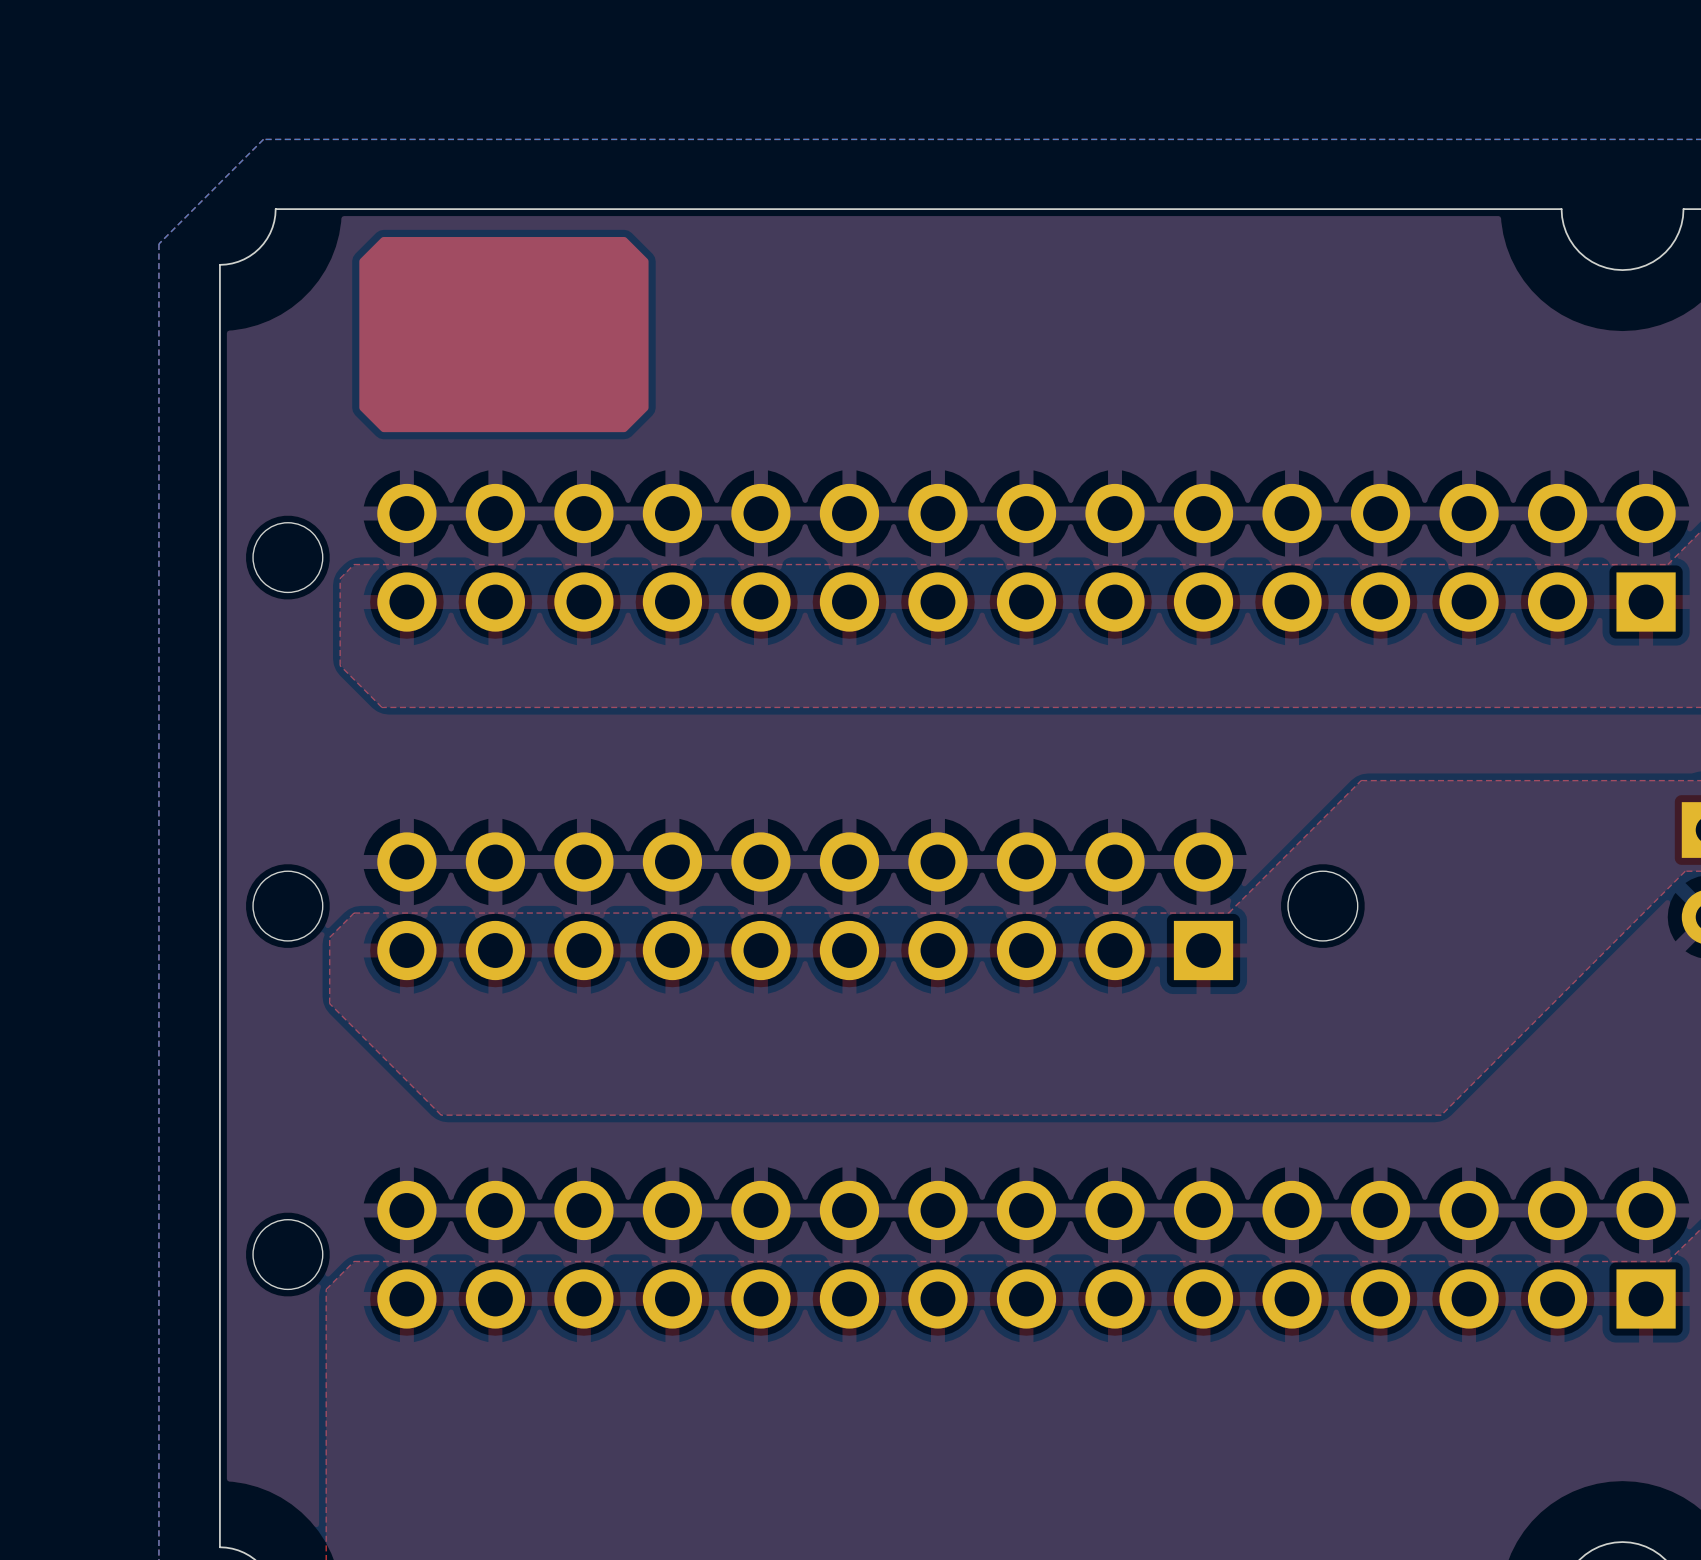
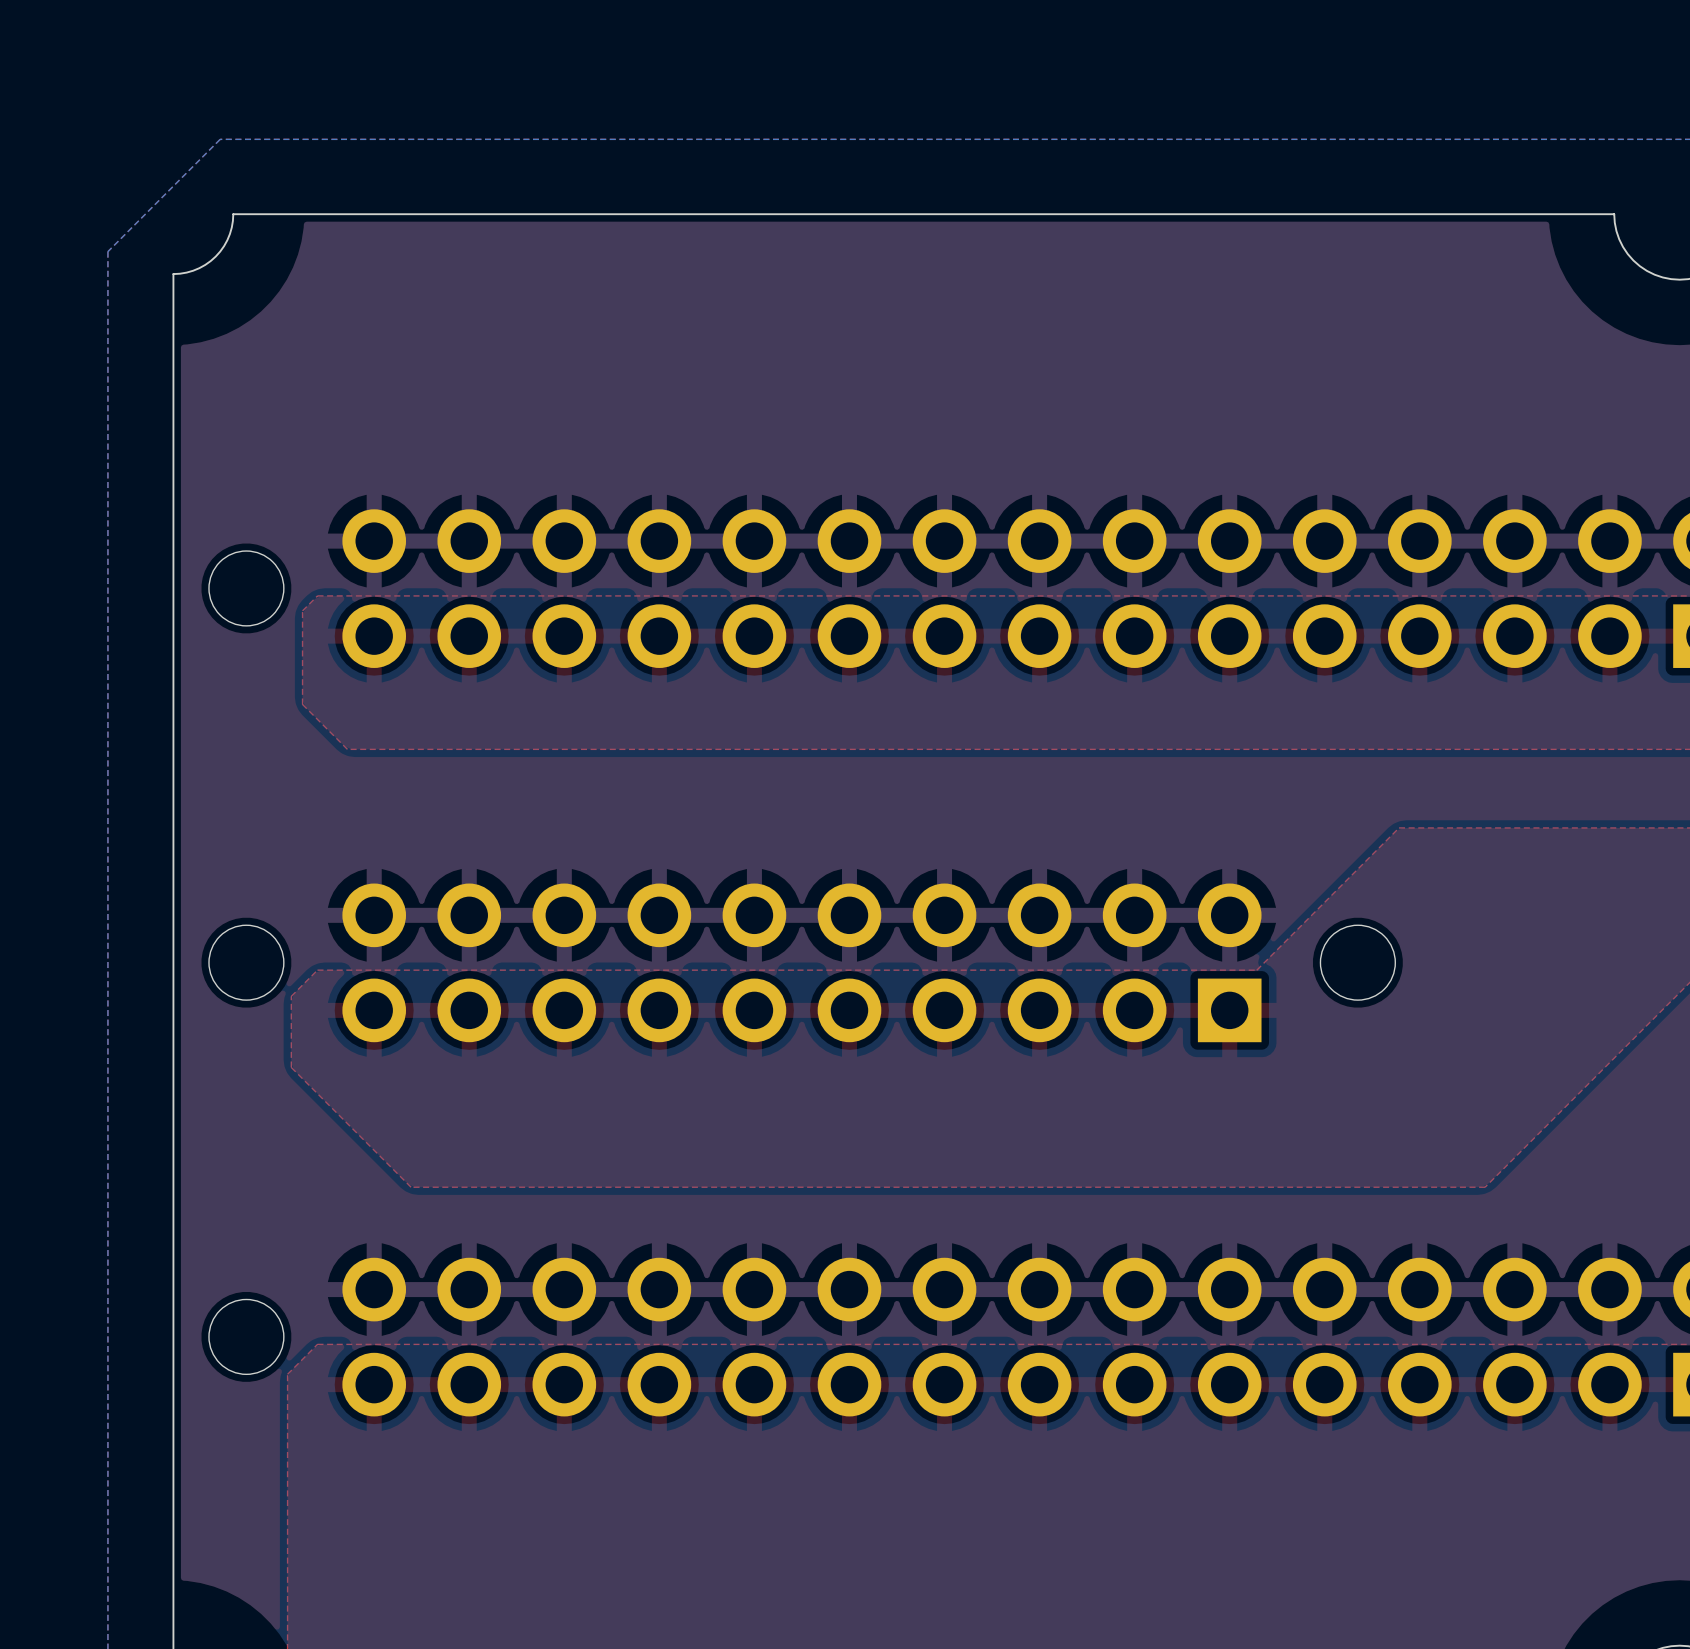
drawing: [359, 236, 649, 433] -> none

